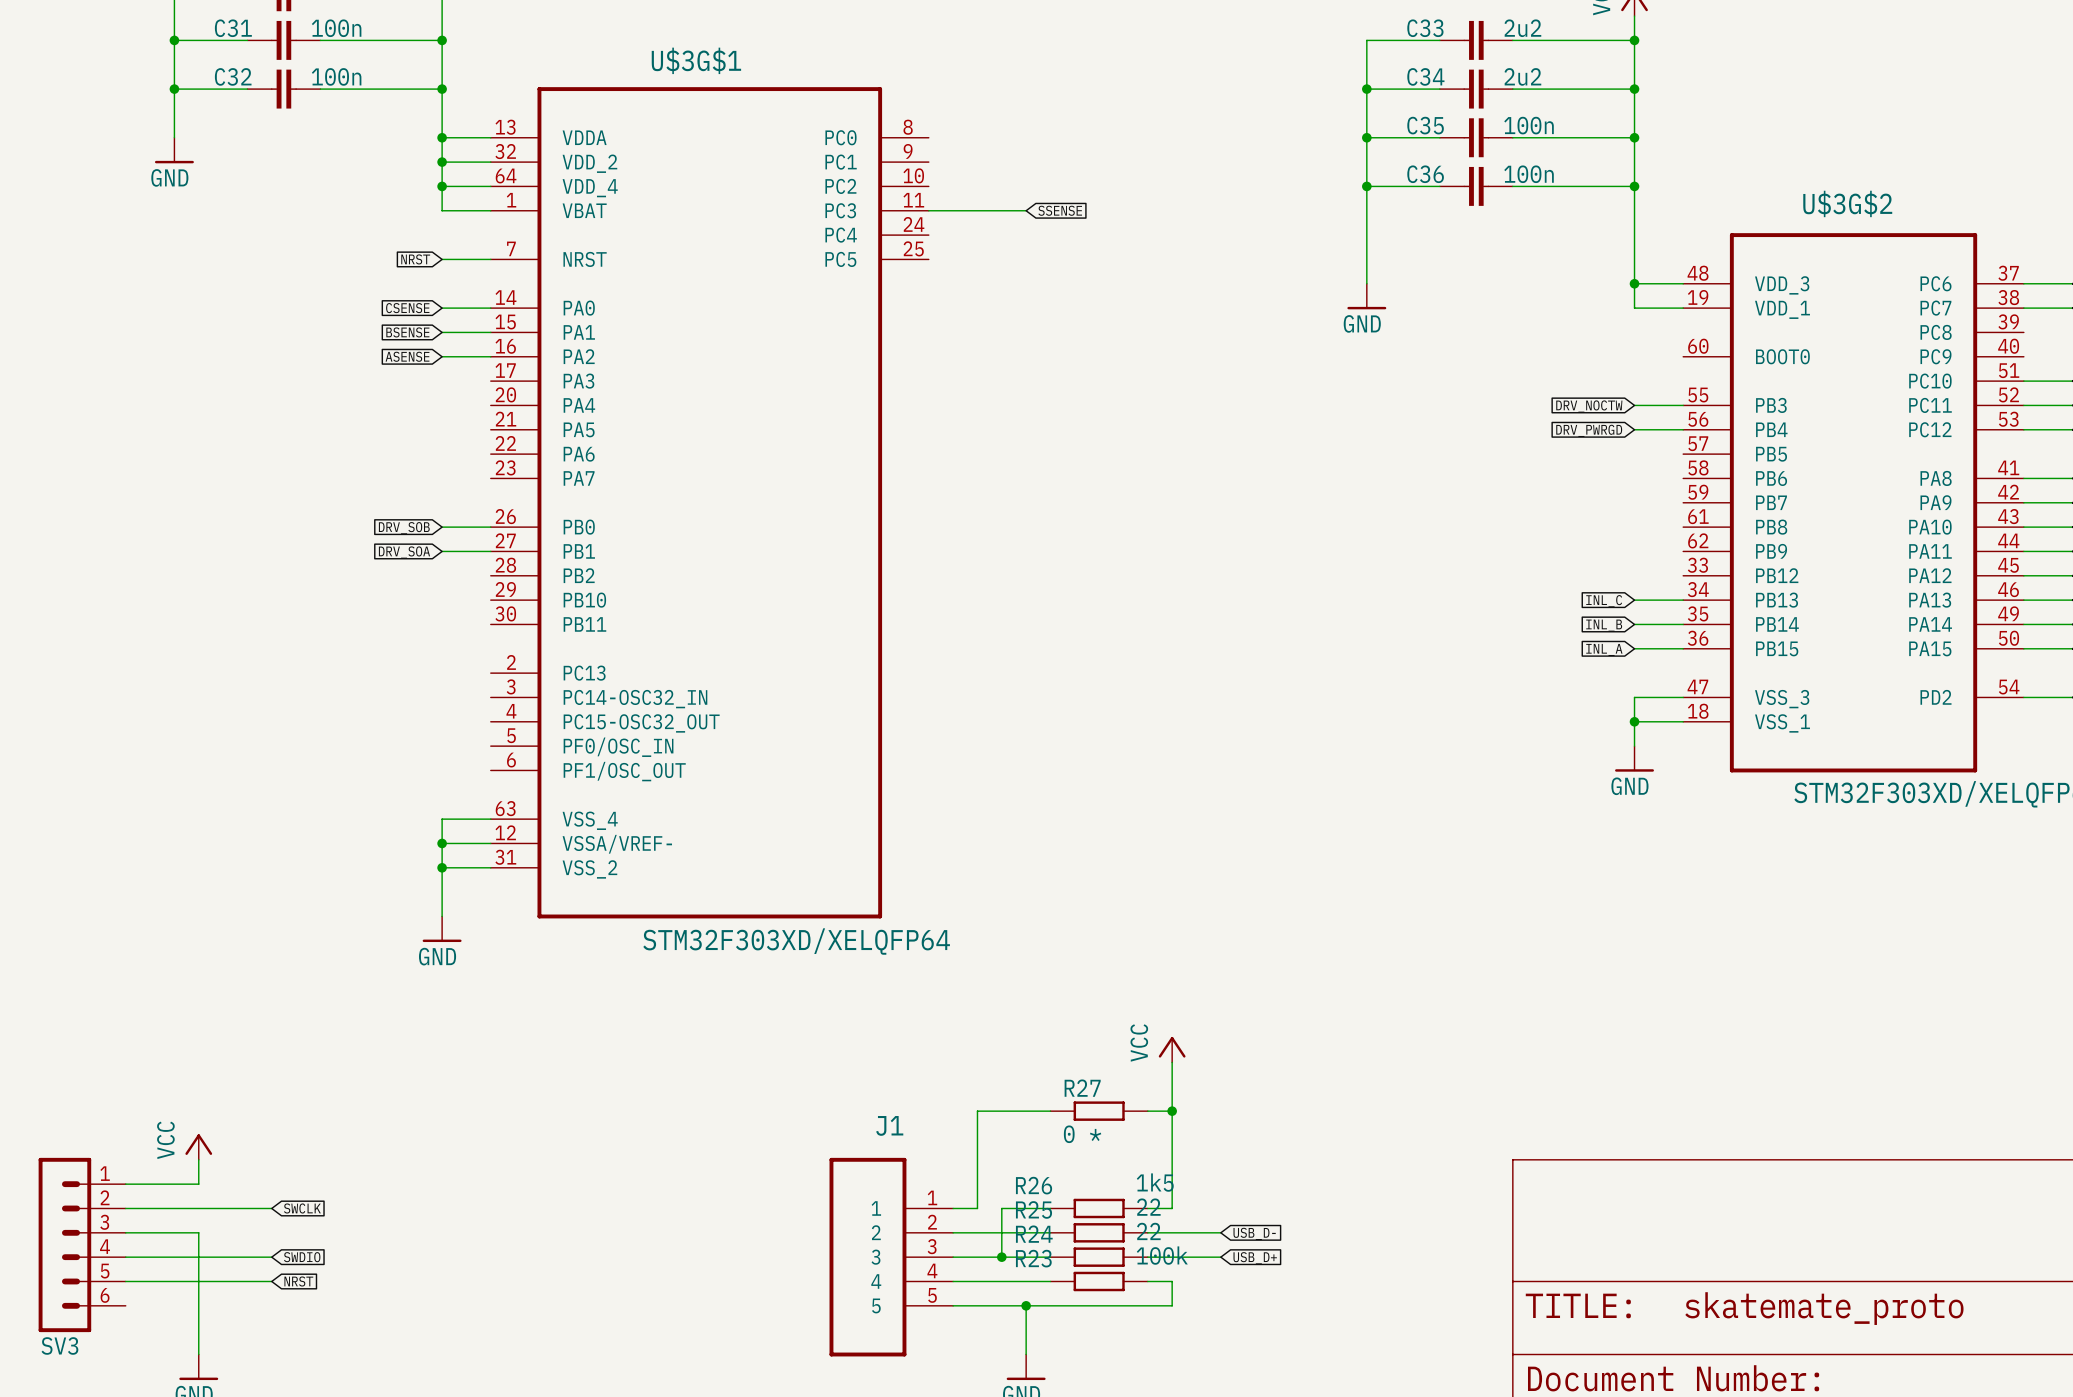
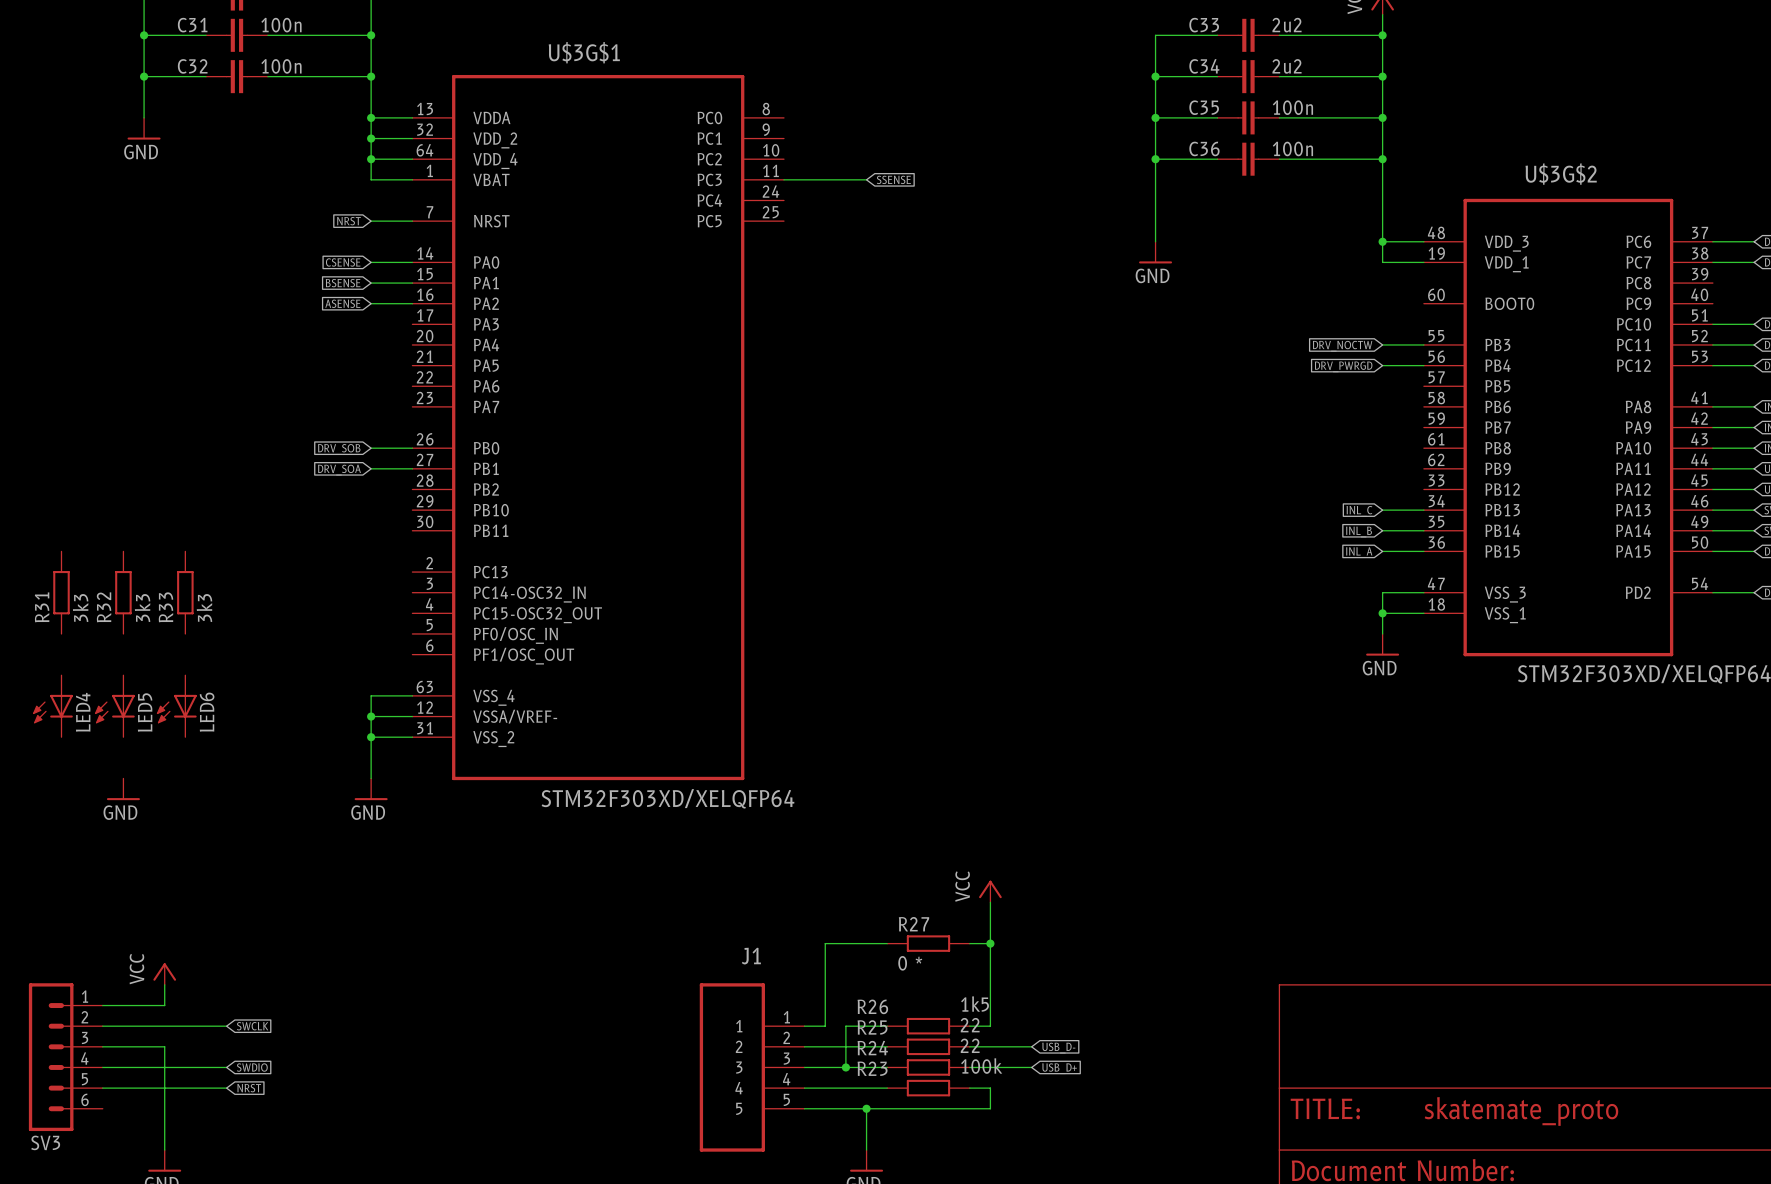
R31: none -> 3k3 (61, 592)
R32: none -> 3k3 (123, 592)
R33: none -> 3k3 (185, 592)
LED4: none -> (52, 706)
LED5: none -> (114, 706)
LED6: none -> (176, 706)
power symbol: none -> GND (123, 789)

